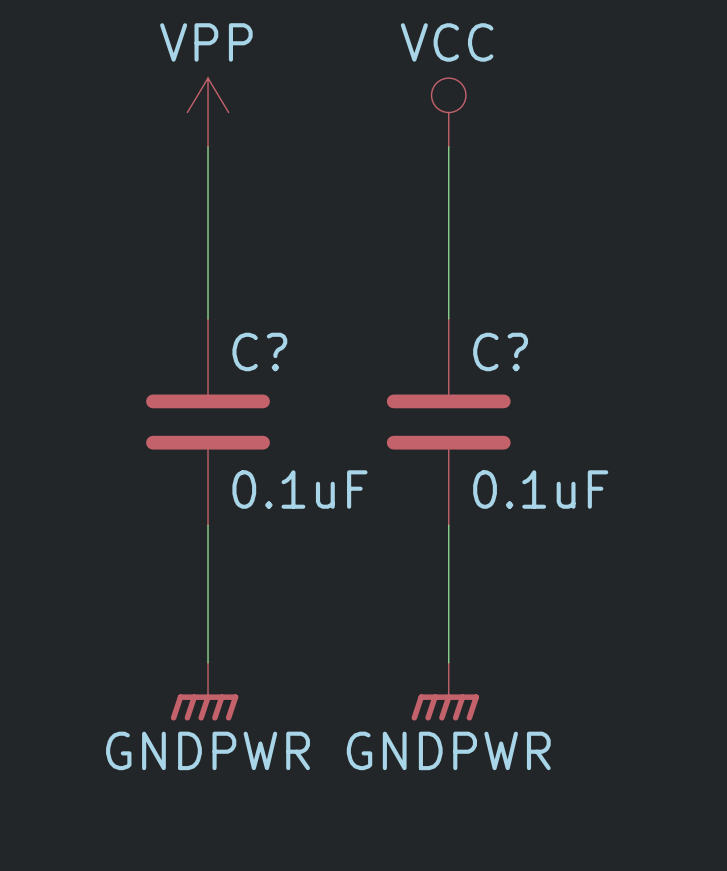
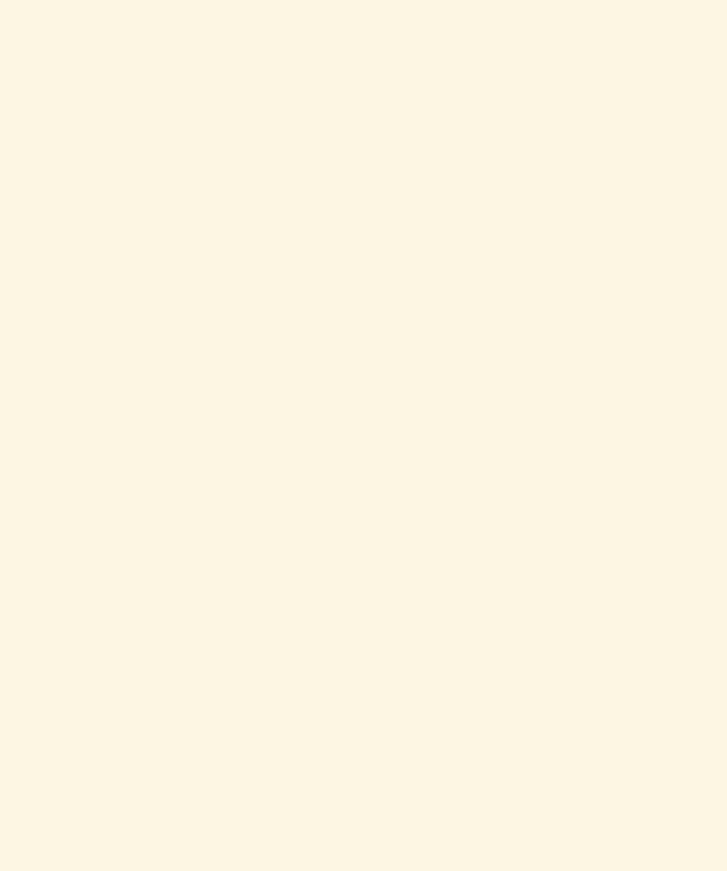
power symbol: VPP (208, 112) -> none
power symbol: VCC (448, 112) -> none
wire: (208, 146) (208, 318) -> none
wire: (448, 146) (448, 318) -> none
C?: 0.1uF (208, 422) -> none
C?: 0.1uF (448, 422) -> none
wire: (208, 525) (208, 662) -> none
wire: (448, 525) (448, 662) -> none
power symbol: GNDPWR (204, 691) -> none
power symbol: GNDPWR (445, 691) -> none

